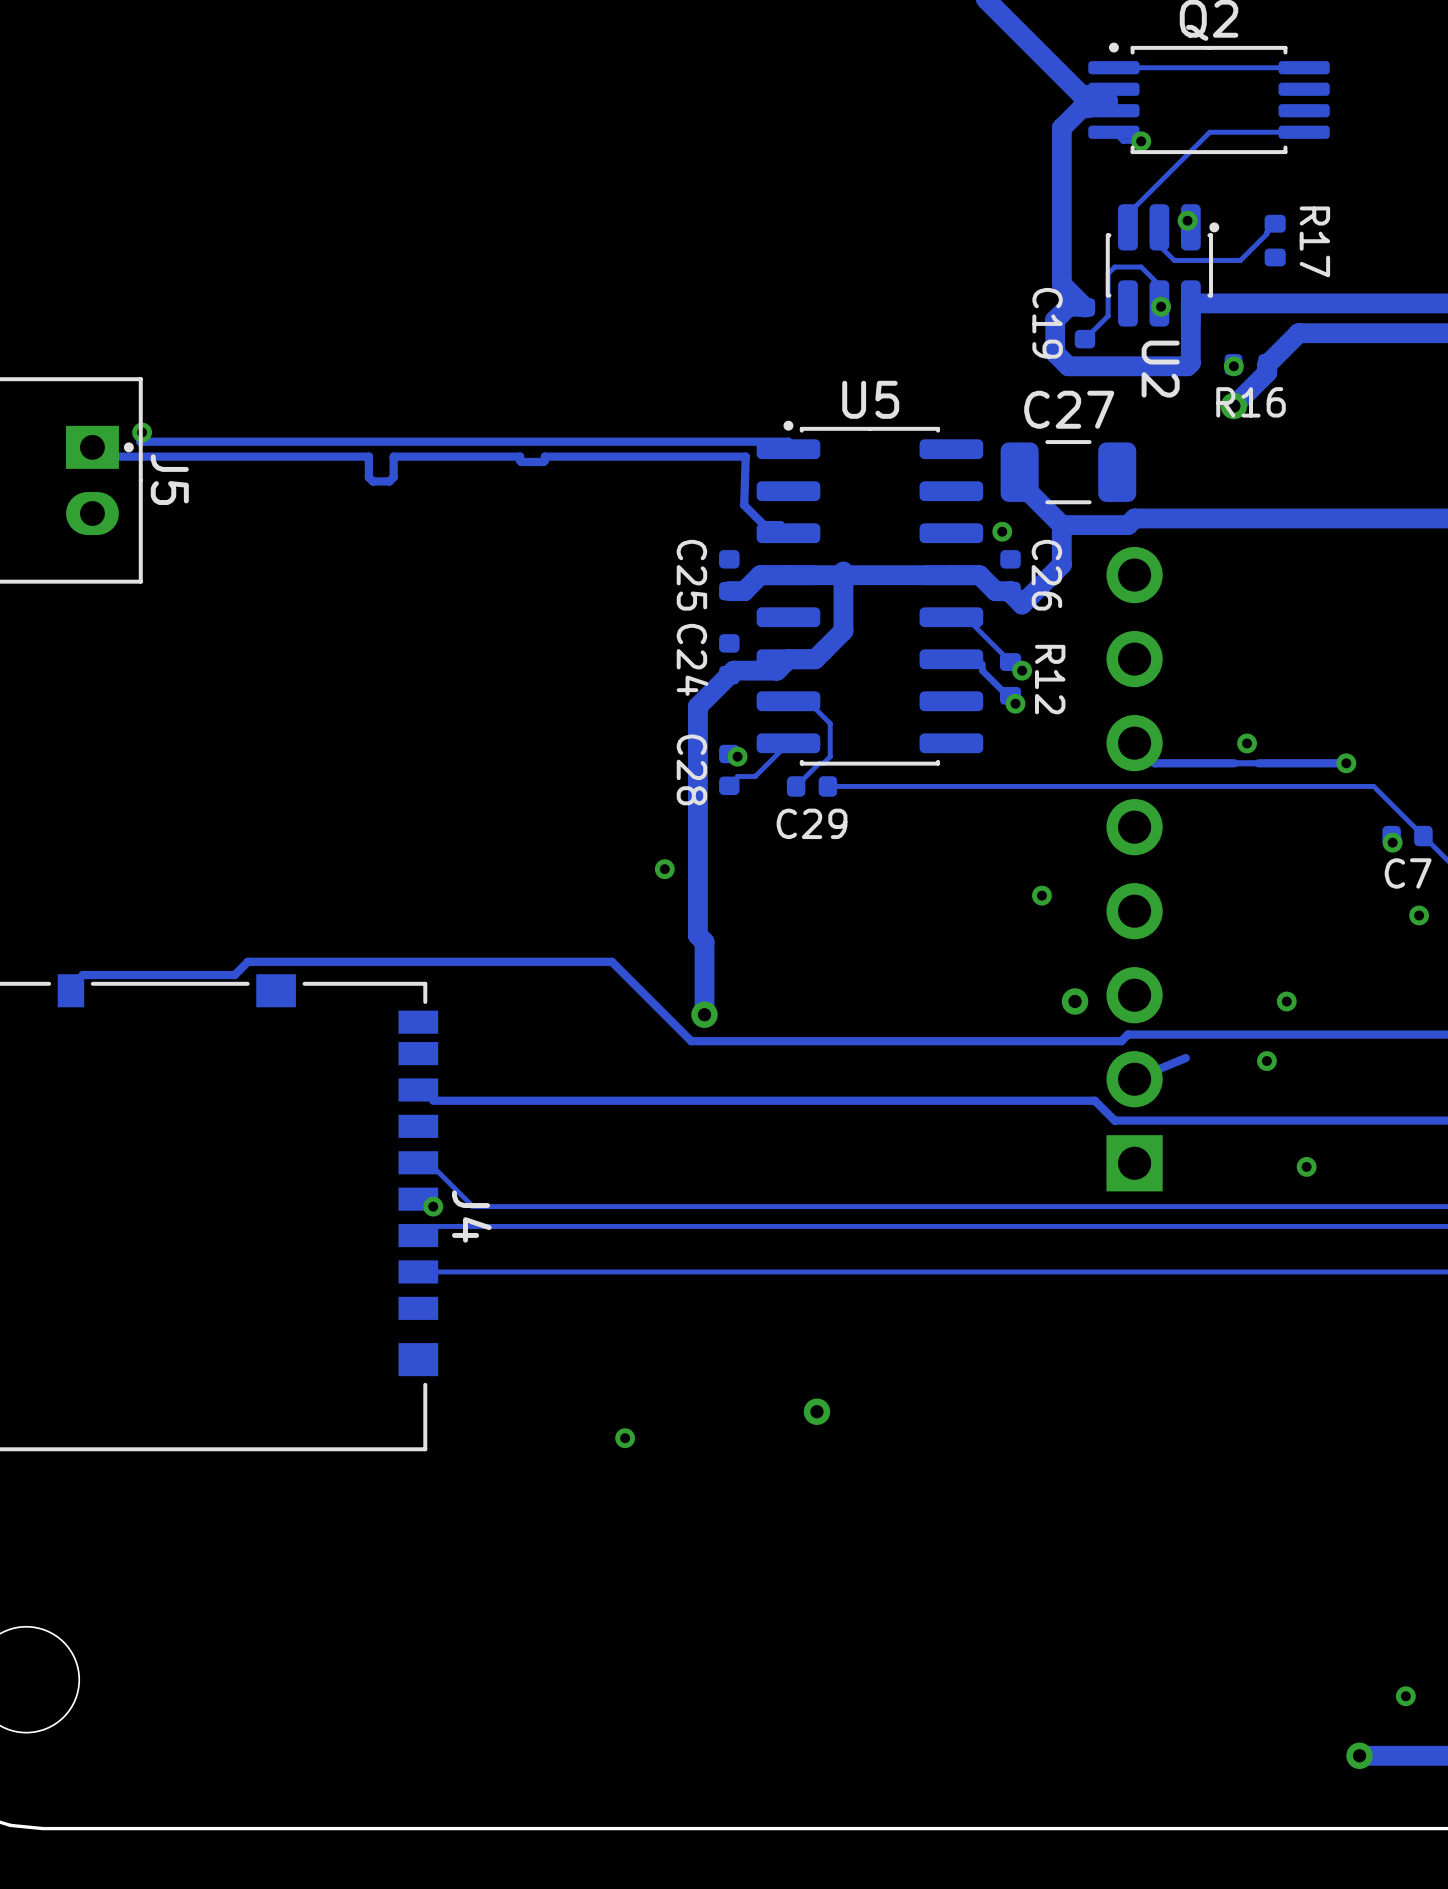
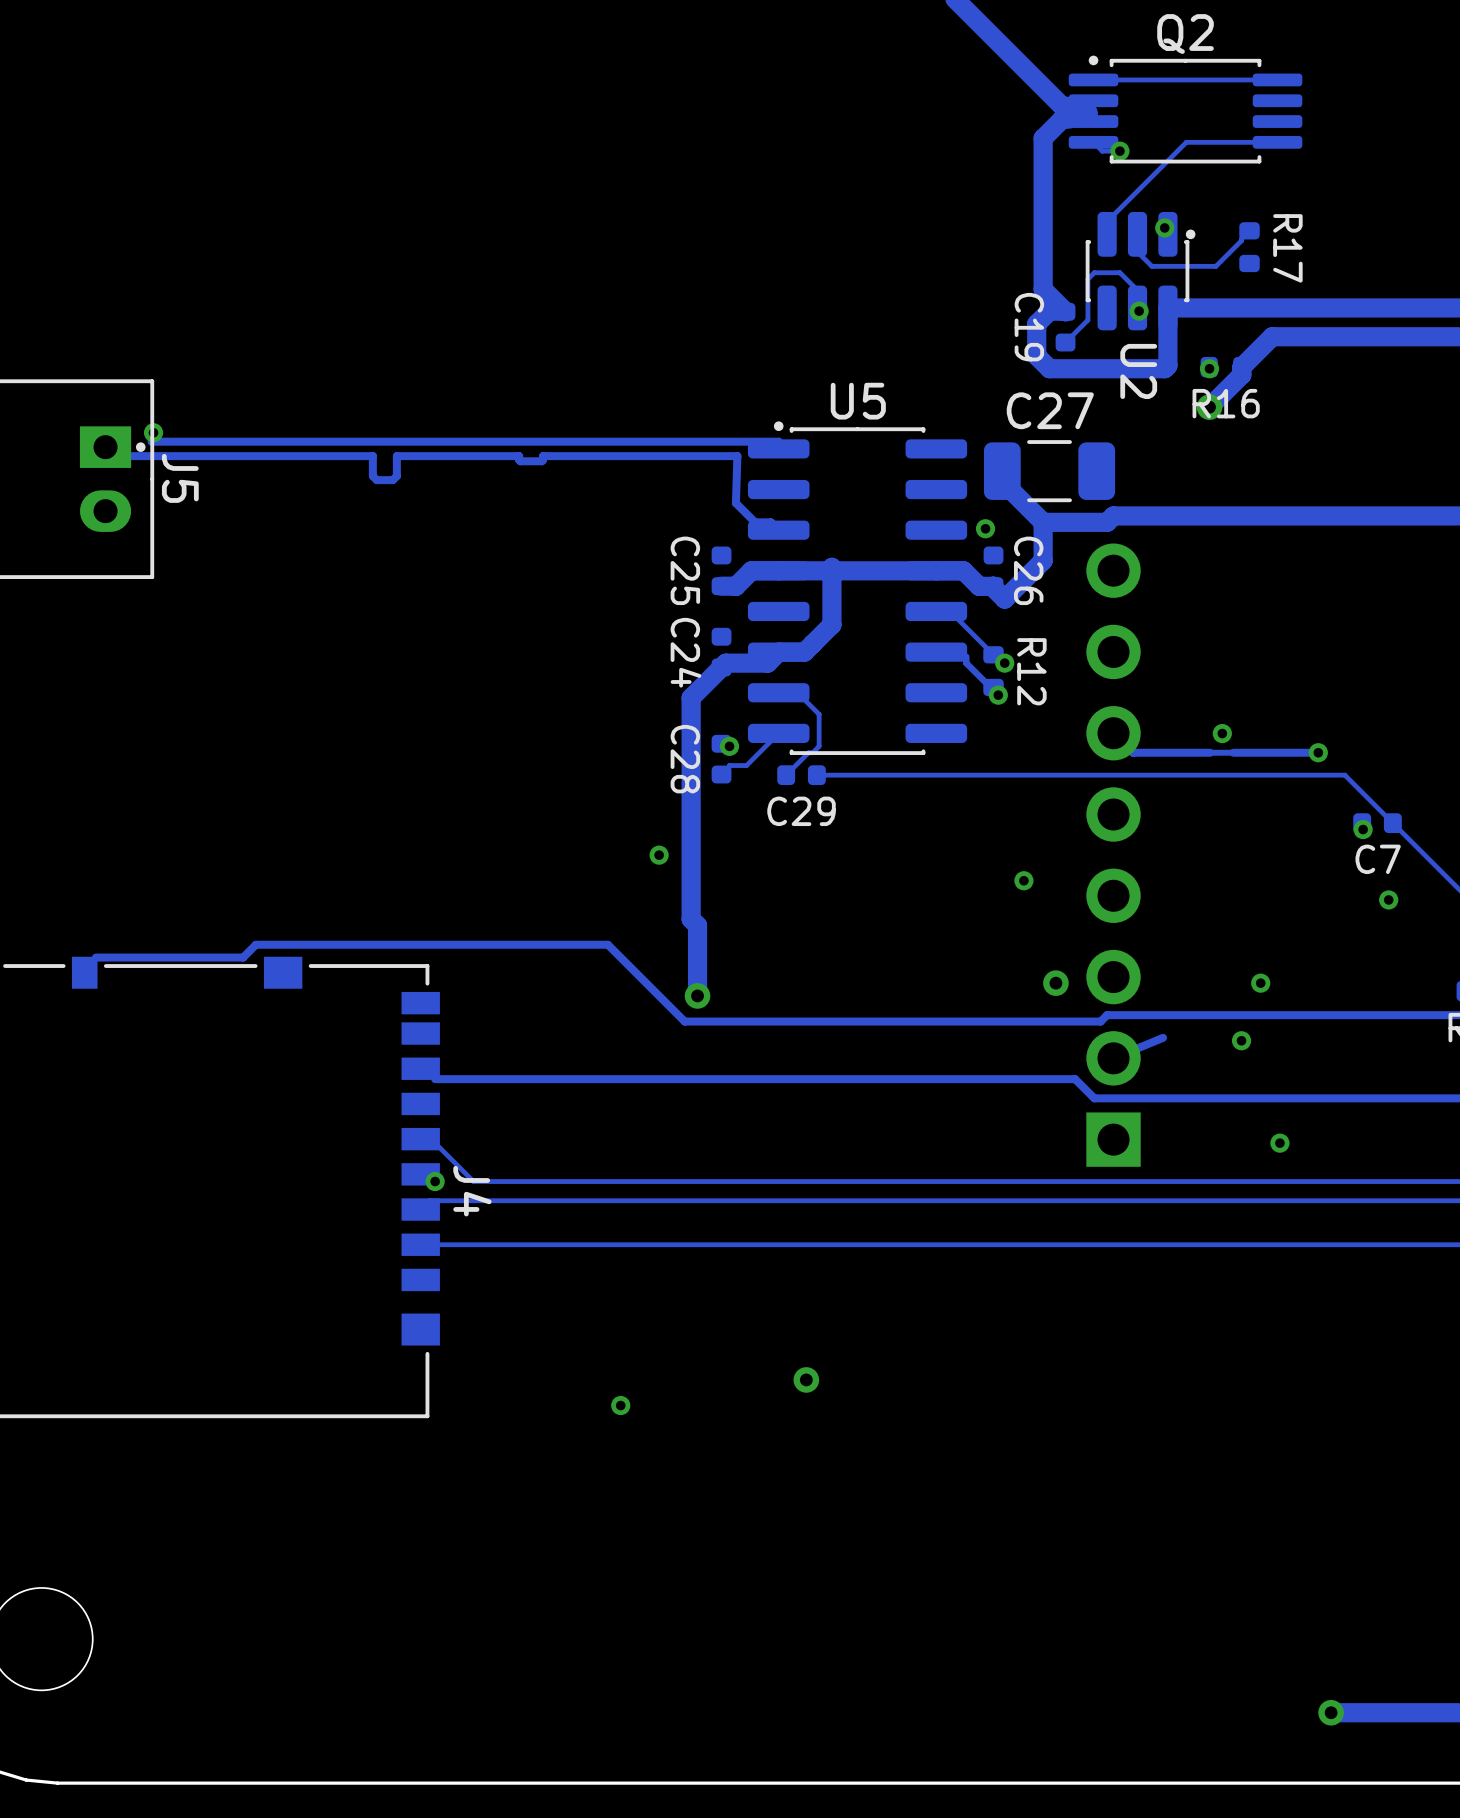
via: (1405, 1696) -> none

